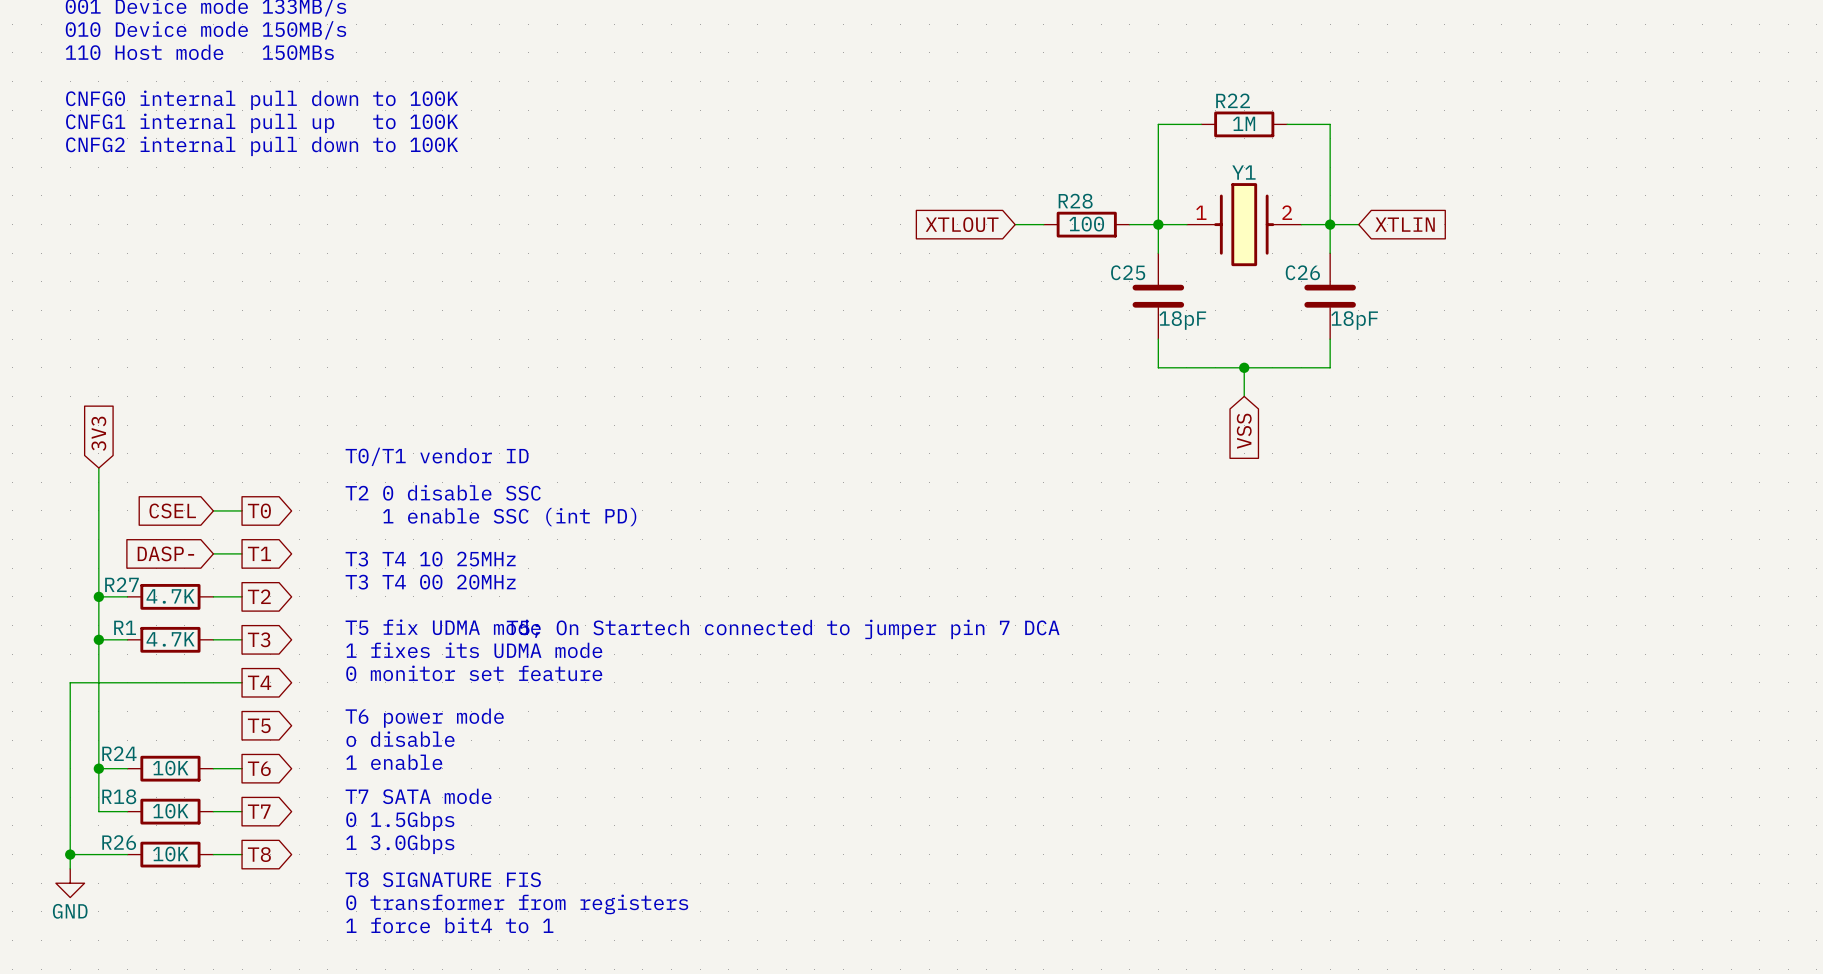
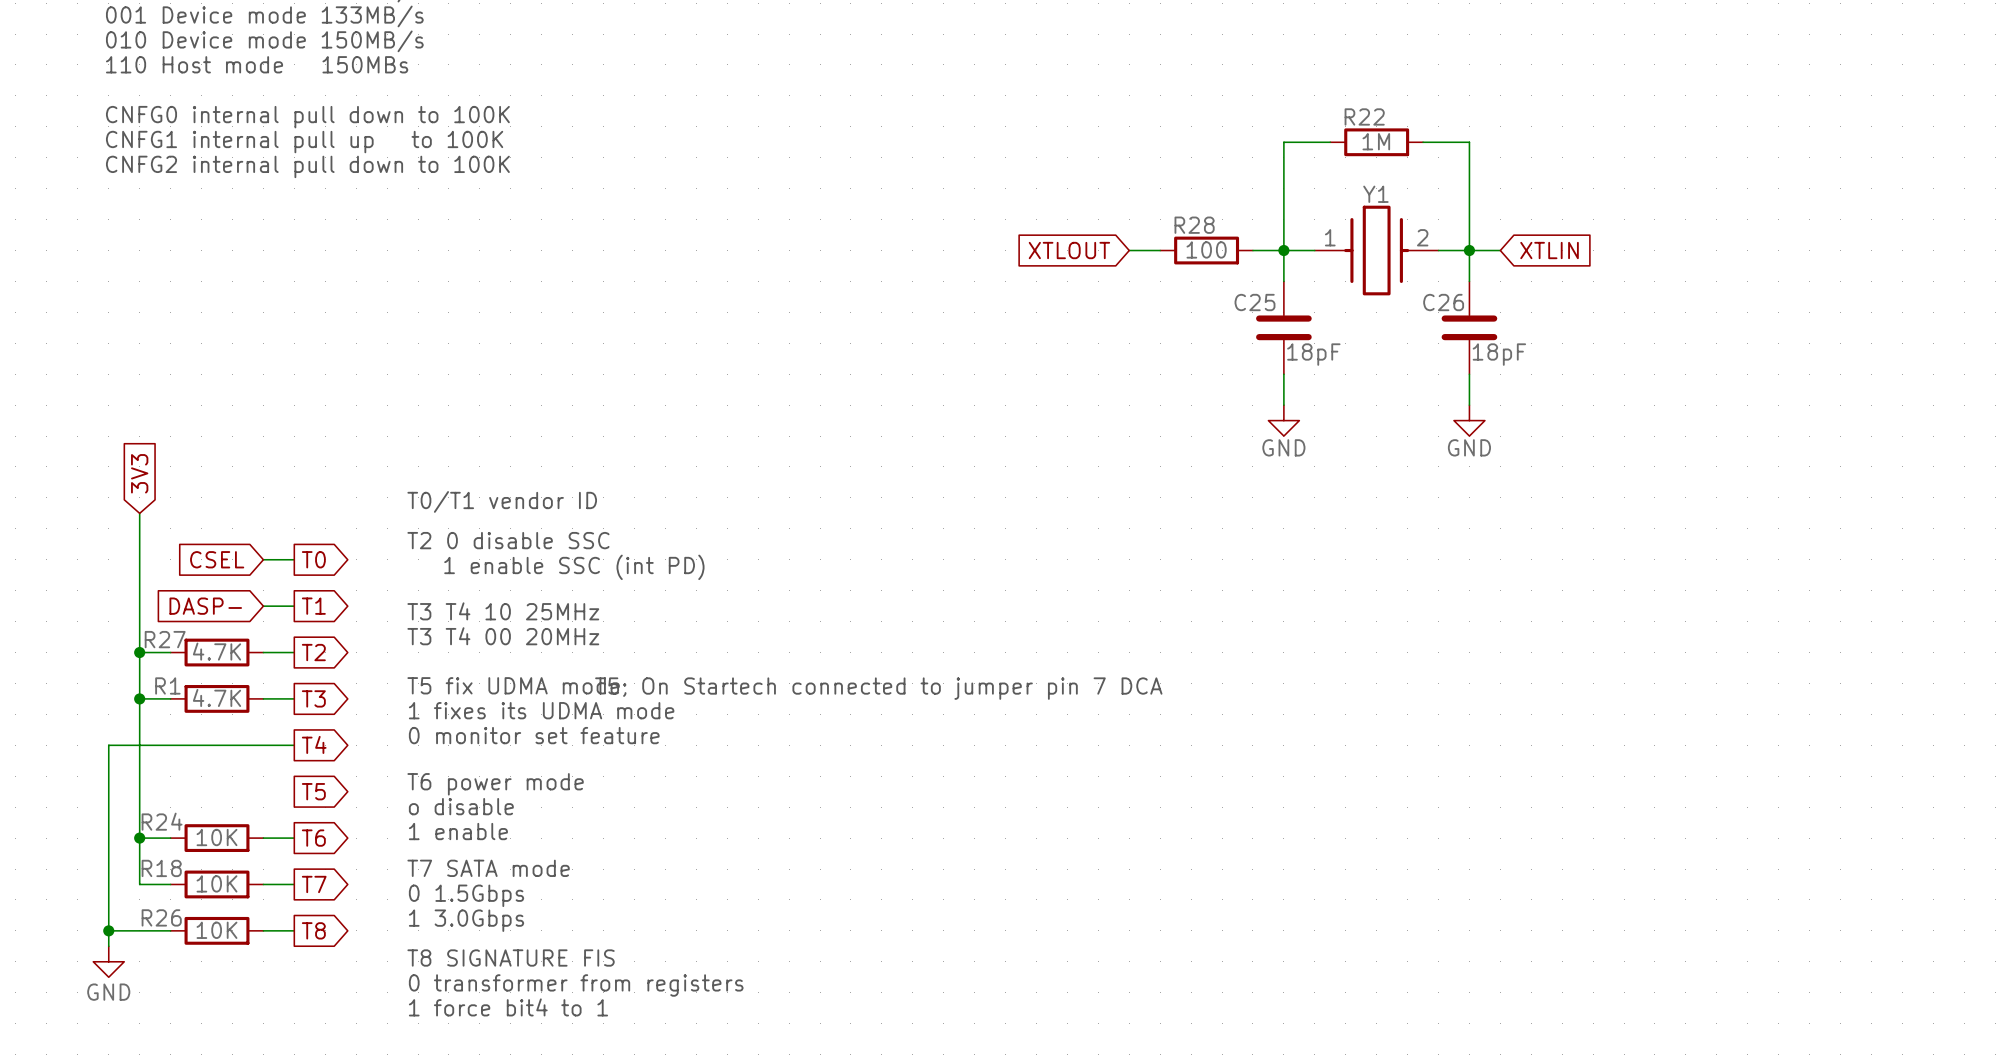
wire: (1158, 367) (1330, 367) -> none
wire: (1244, 367) (1244, 396) -> none
junction: (1244, 367) -> none
power symbol: none -> GND (1283, 420)
power symbol: none -> GND (1469, 420)
global label: VSS (1244, 431) -> none

